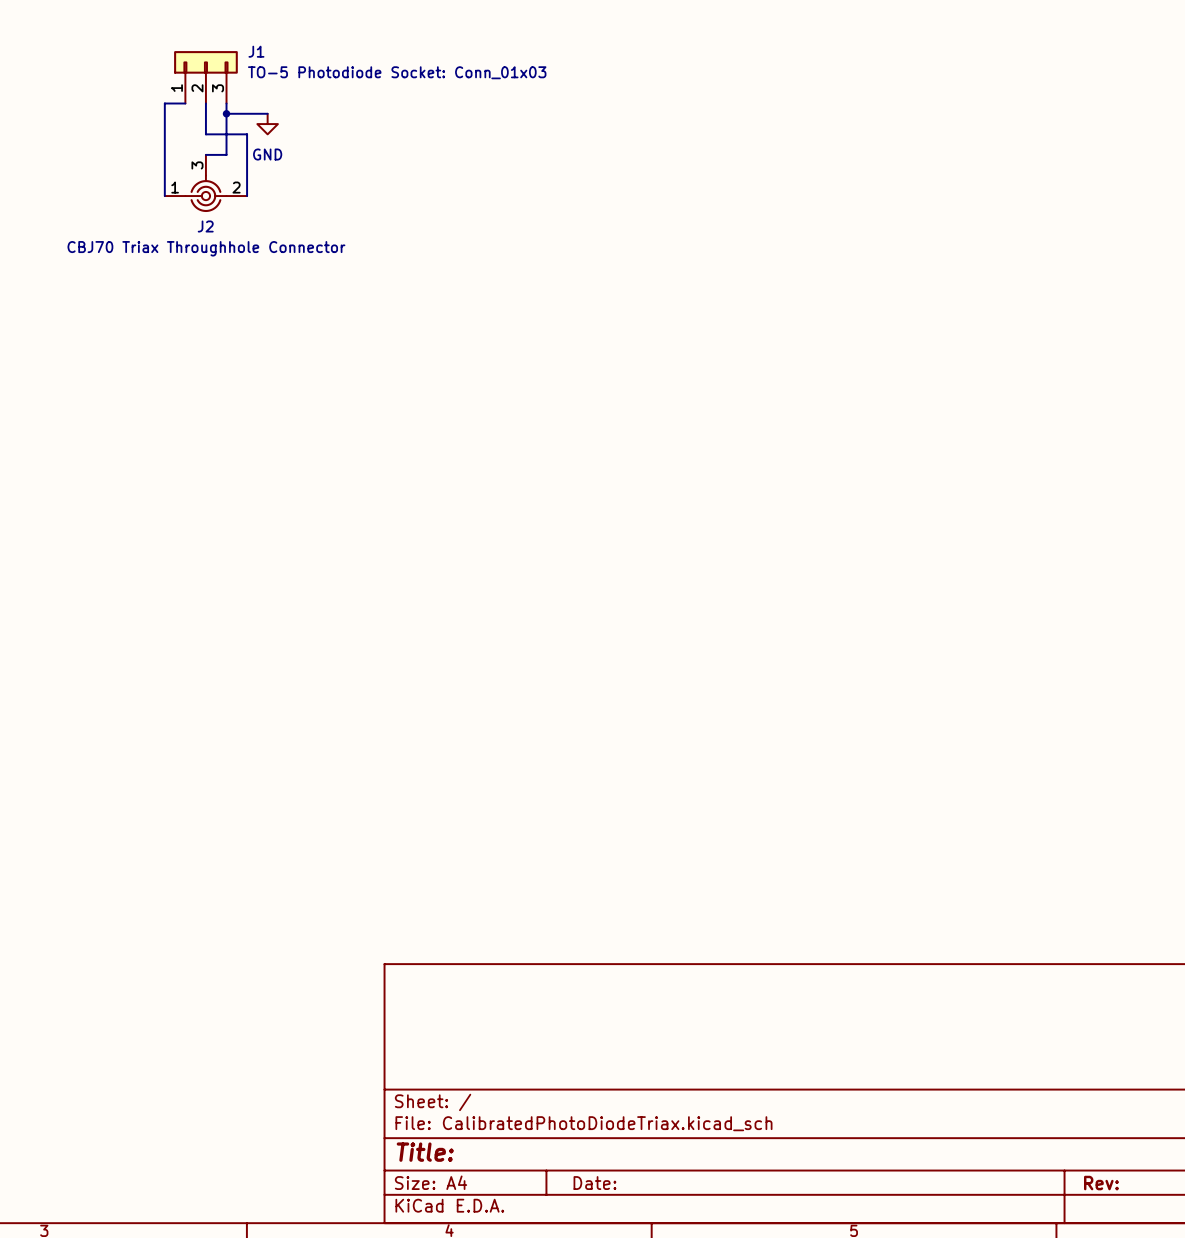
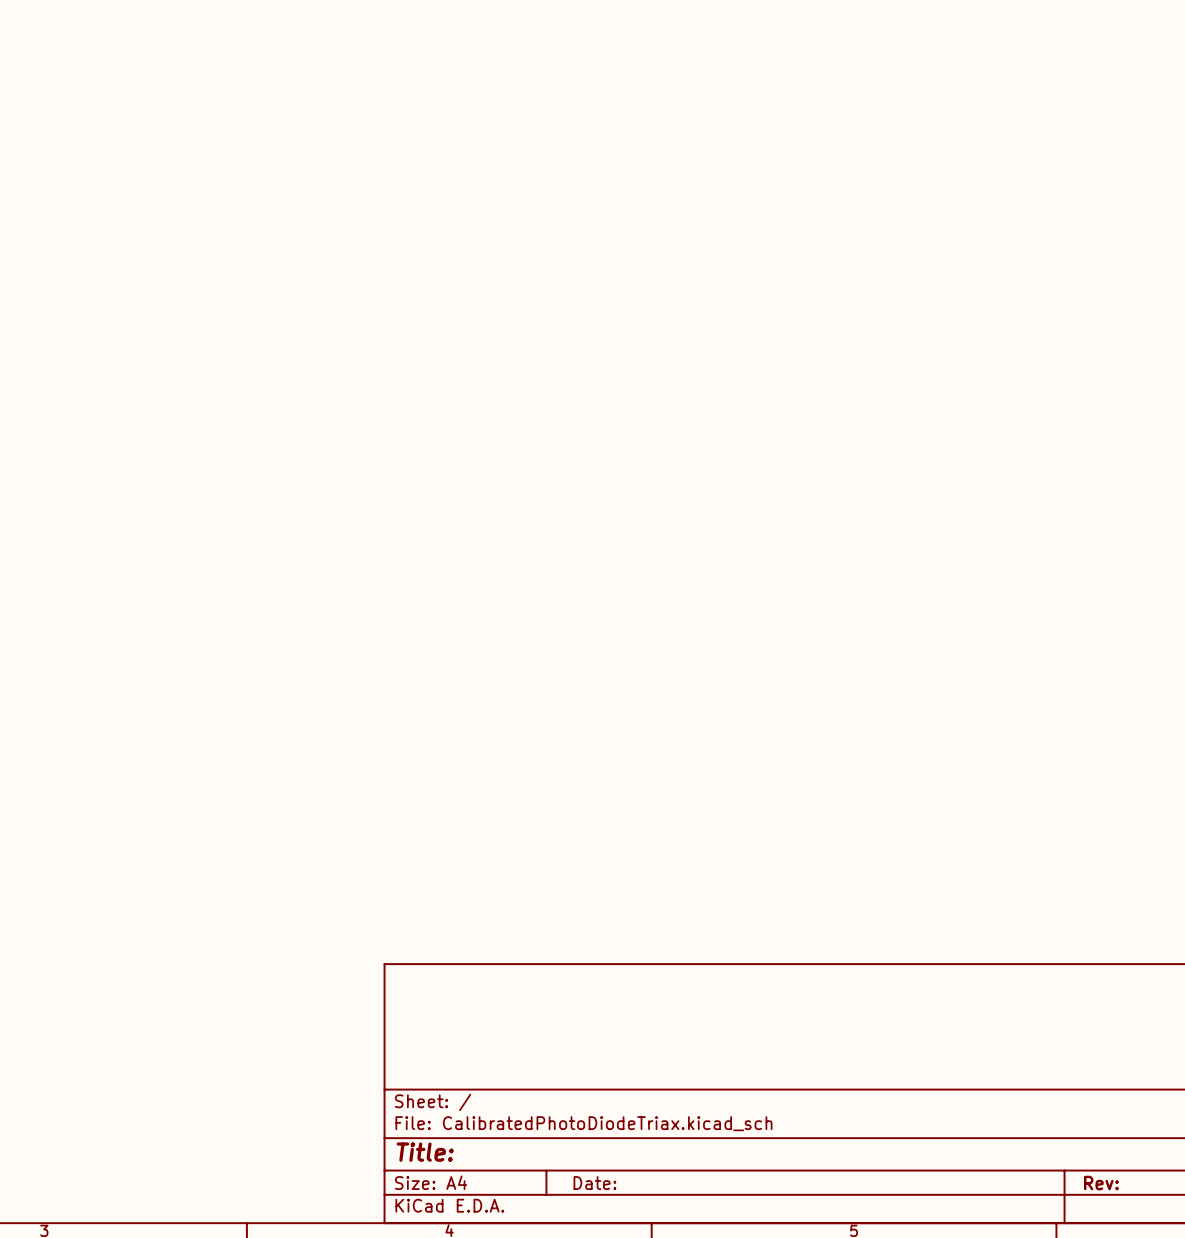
J1: TO-5 Photodiode Socket: Conn_01x03 (205, 77) -> none
wire: (185, 103) (164, 103) (164, 196) -> none
wire: (205, 103) (205, 134) (247, 134) (247, 196) -> none
wire: (226, 103) (226, 154) (205, 154) -> none
wire: (226, 113) (267, 113) -> none
junction: (226, 113) -> none
power symbol: GND (267, 124) -> none
J2: CBJ70 Triax Throughhole Connector (205, 183) -> none

